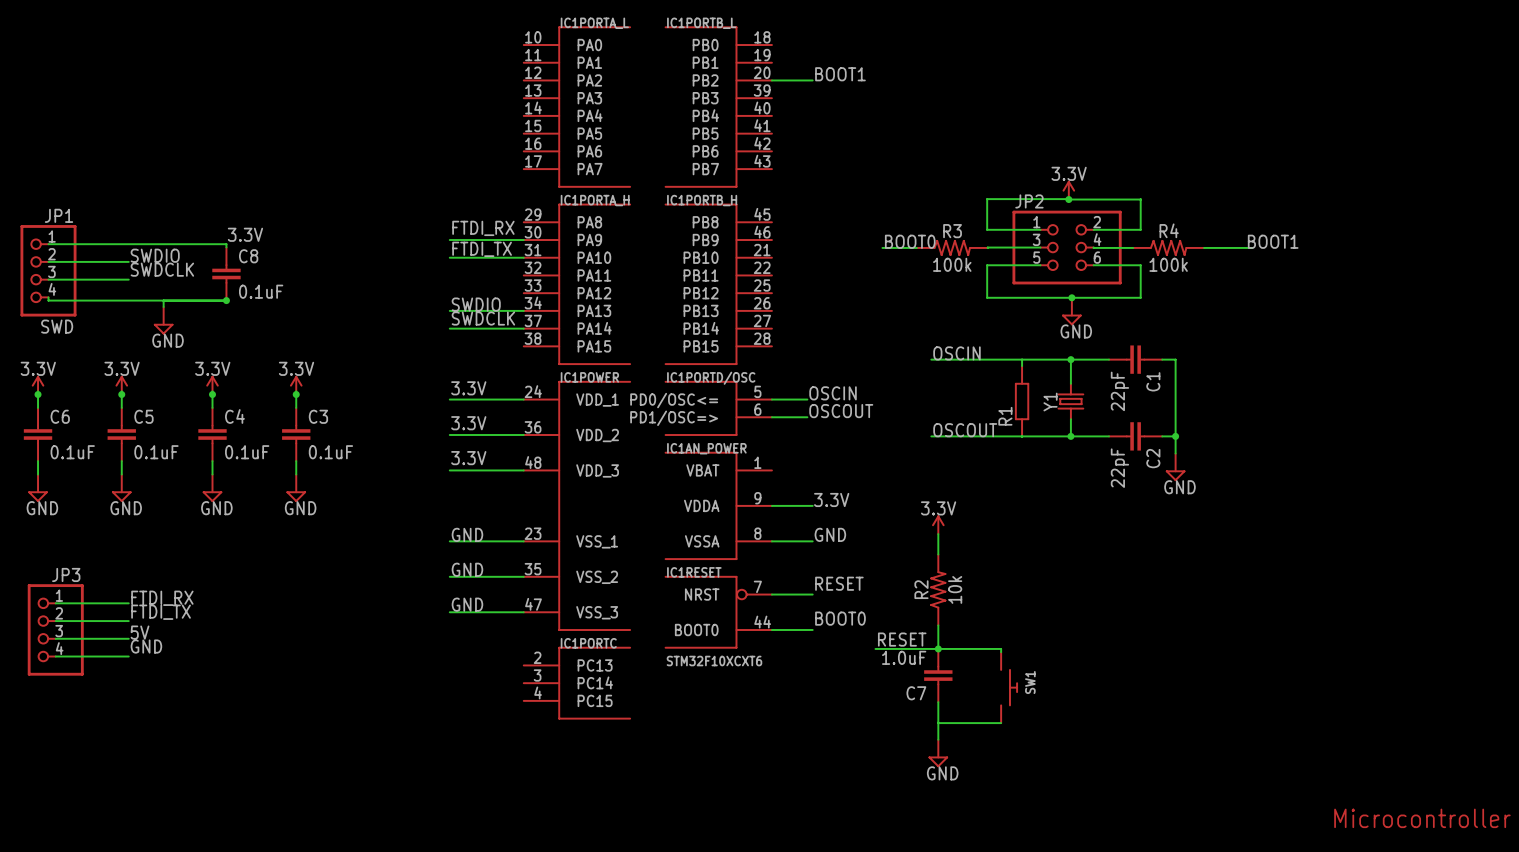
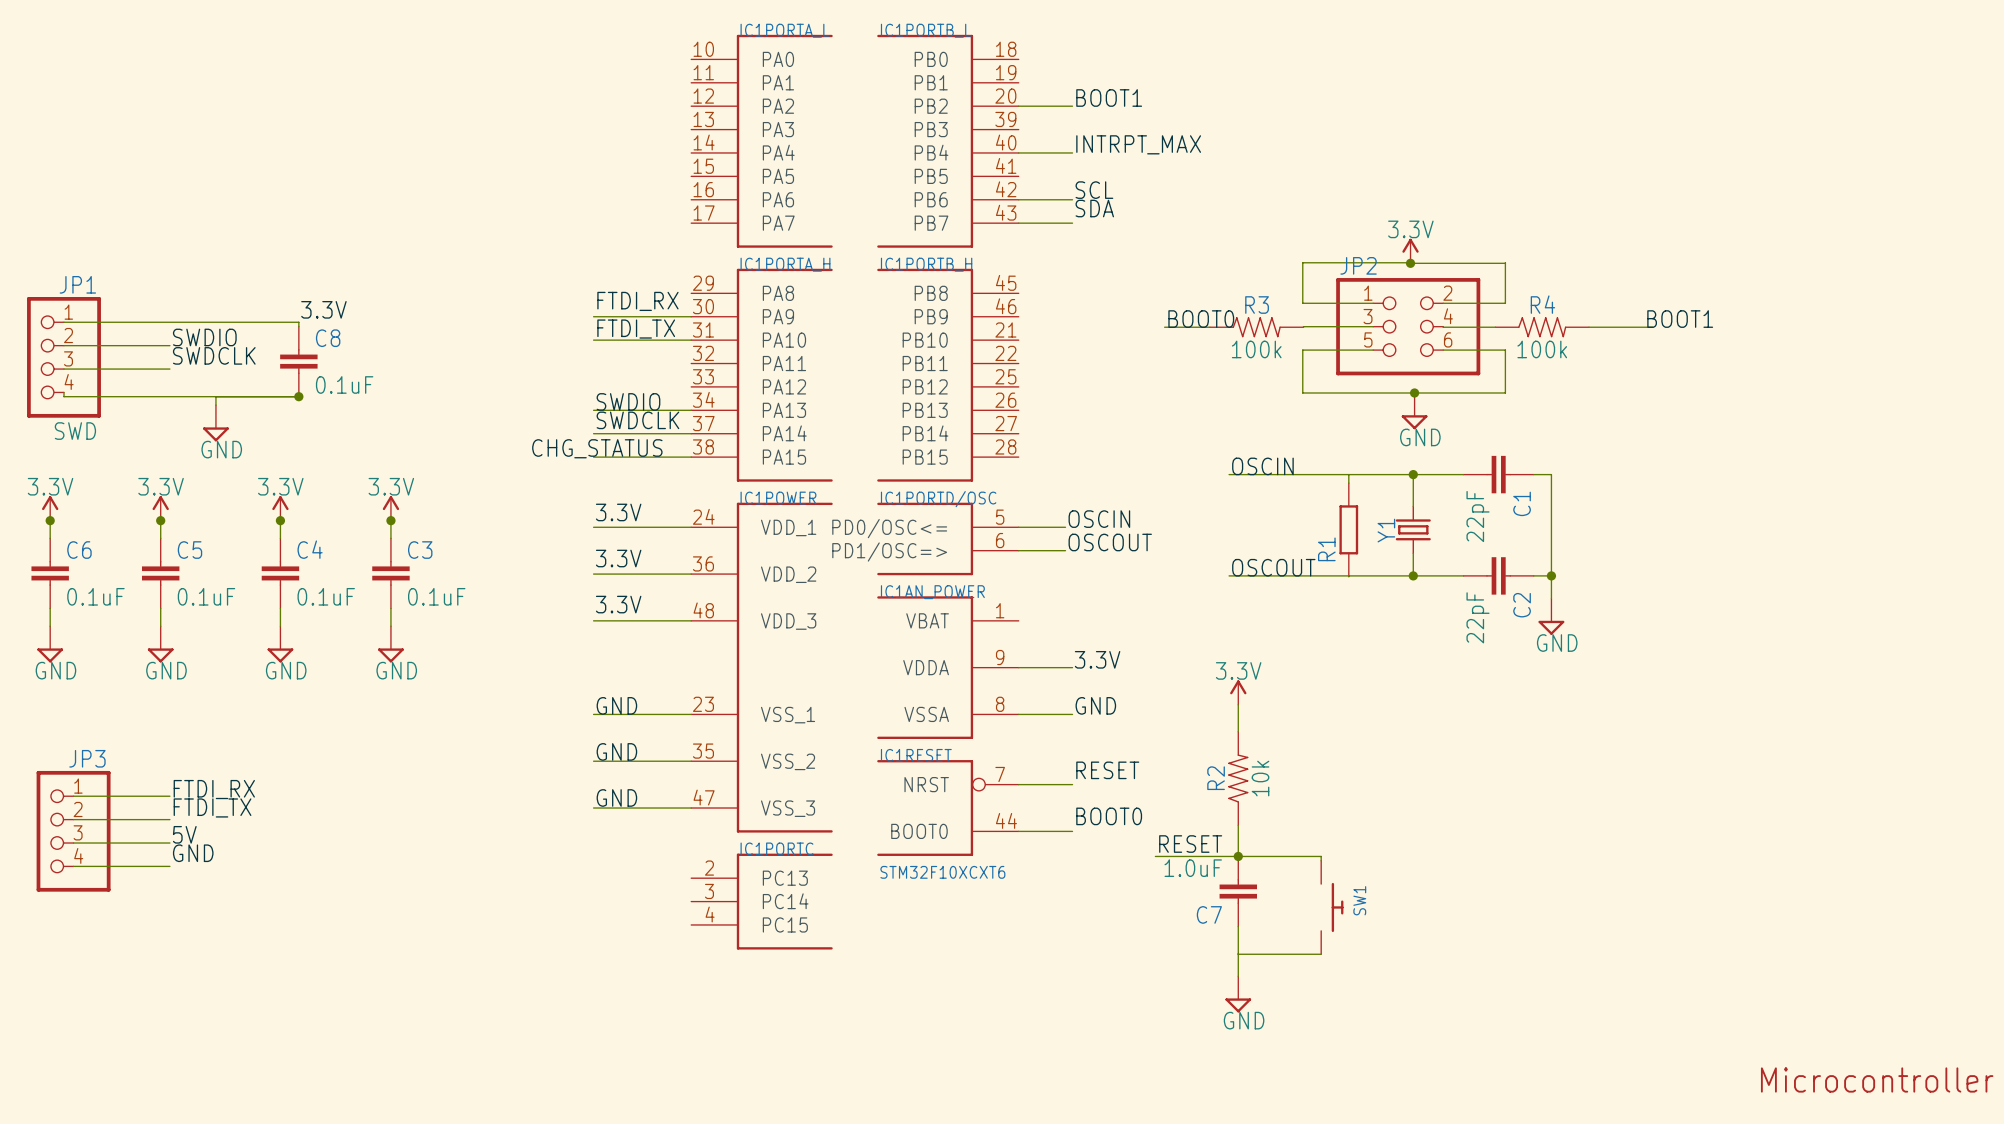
label: none -> INTRPT_MAX (1138, 144)
wire: none -> (1018, 152) (1072, 152)
label: none -> SCL (1094, 190)
wire: none -> (1018, 199) (1072, 199)
label: none -> SDA (1094, 208)
wire: none -> (1018, 223) (1072, 223)
label: none -> CHG_STATUS (597, 448)
wire: none -> (593, 457) (691, 457)

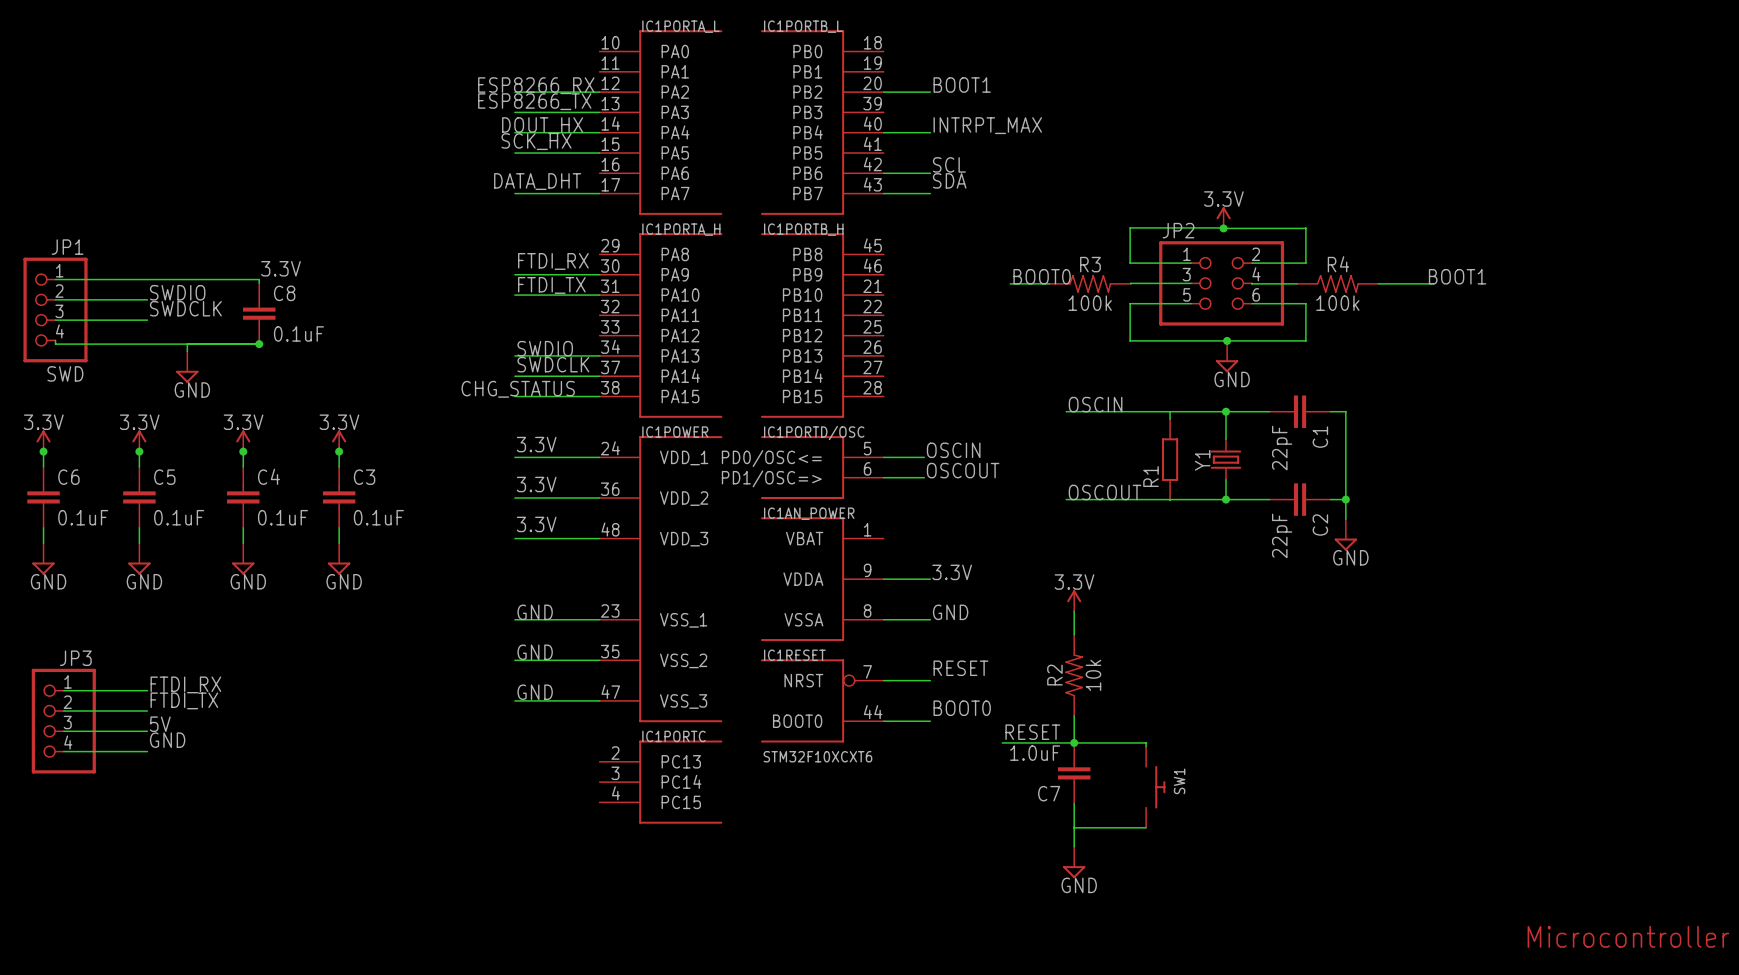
label: none -> ESP8266_RX (536, 85)
wire: none -> (514, 92) (599, 92)
label: none -> ESP8266_TX (534, 101)
wire: none -> (514, 112) (599, 112)
label: none -> DOUT_HX (542, 125)
wire: none -> (514, 132) (599, 132)
label: none -> SCK_HX (536, 141)
wire: none -> (514, 153) (599, 153)
label: none -> DATA_DHT (537, 181)
wire: none -> (514, 193) (599, 193)

